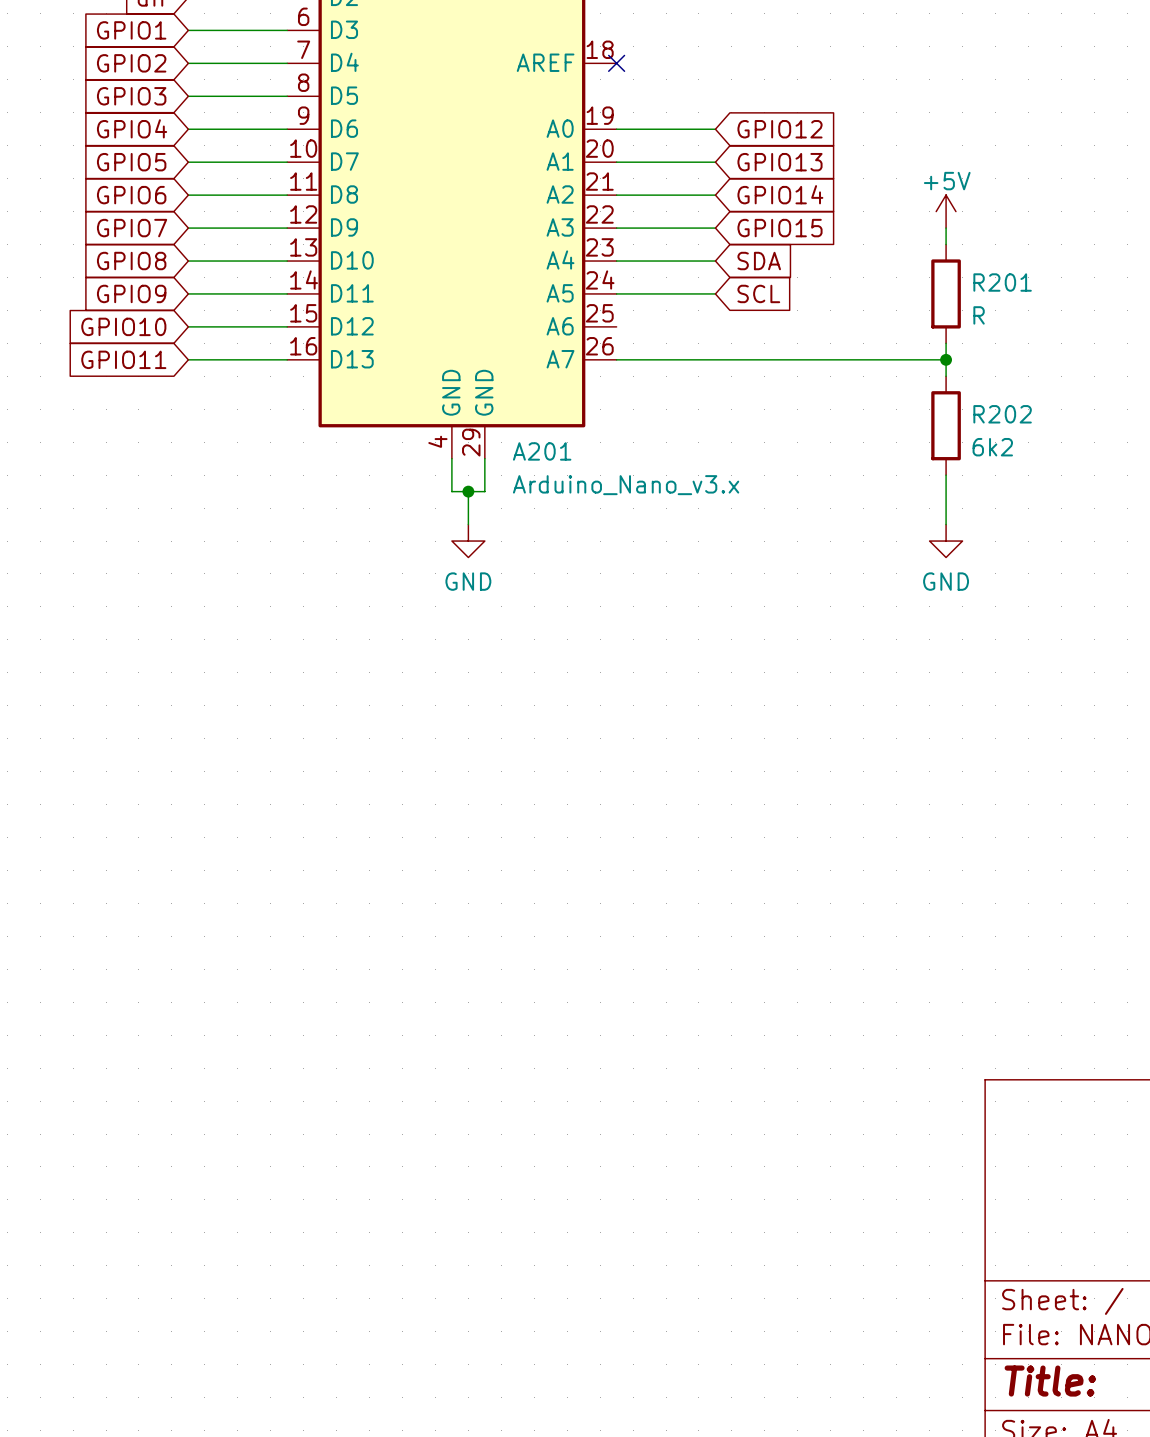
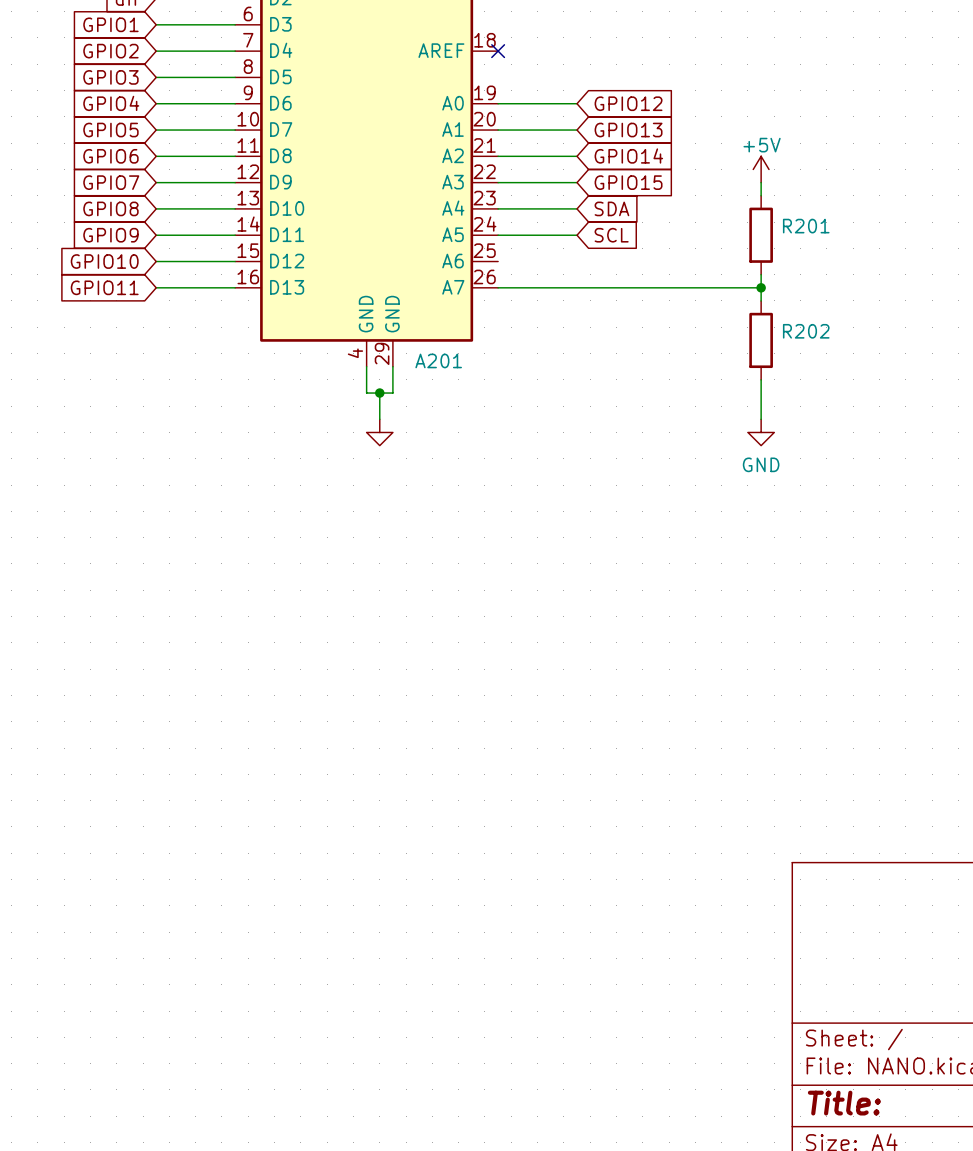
R201 value: R (979, 315) -> none
R202 value: 6k2 (992, 447) -> none
A201 value: Arduino_Nano_v3.x (626, 485) -> none
power symbol text: GND (468, 581) -> none

